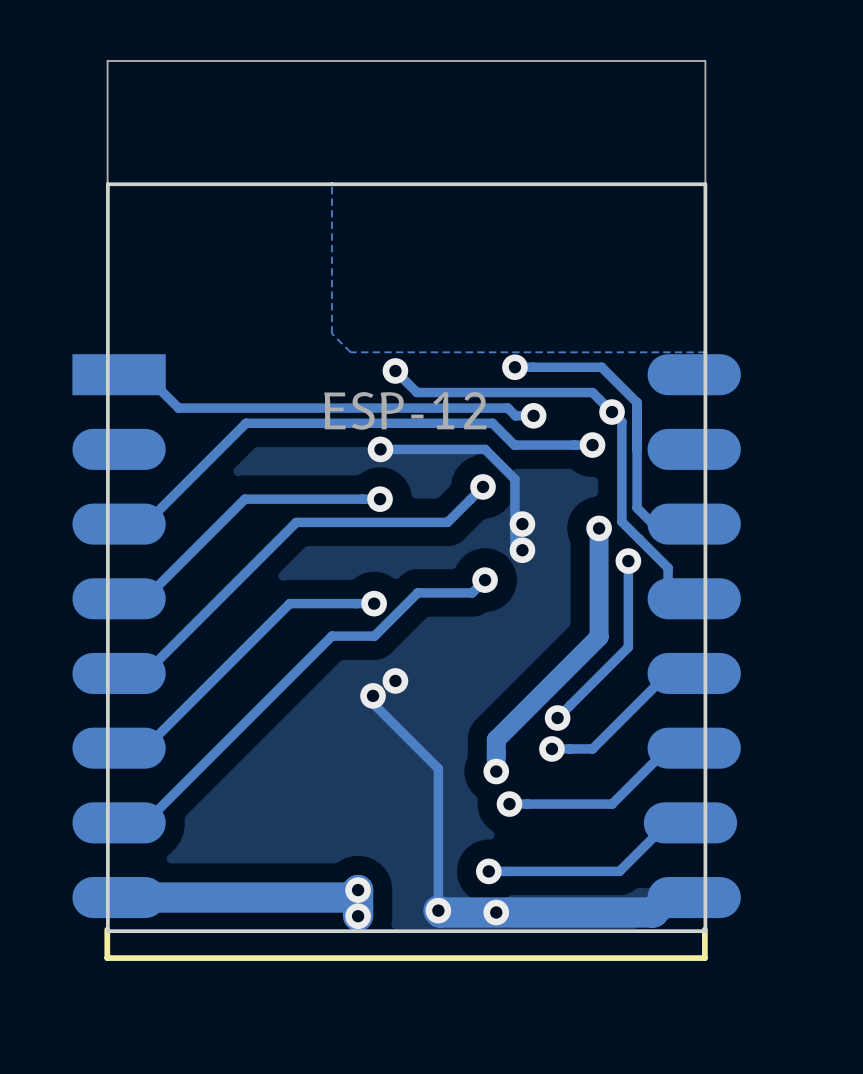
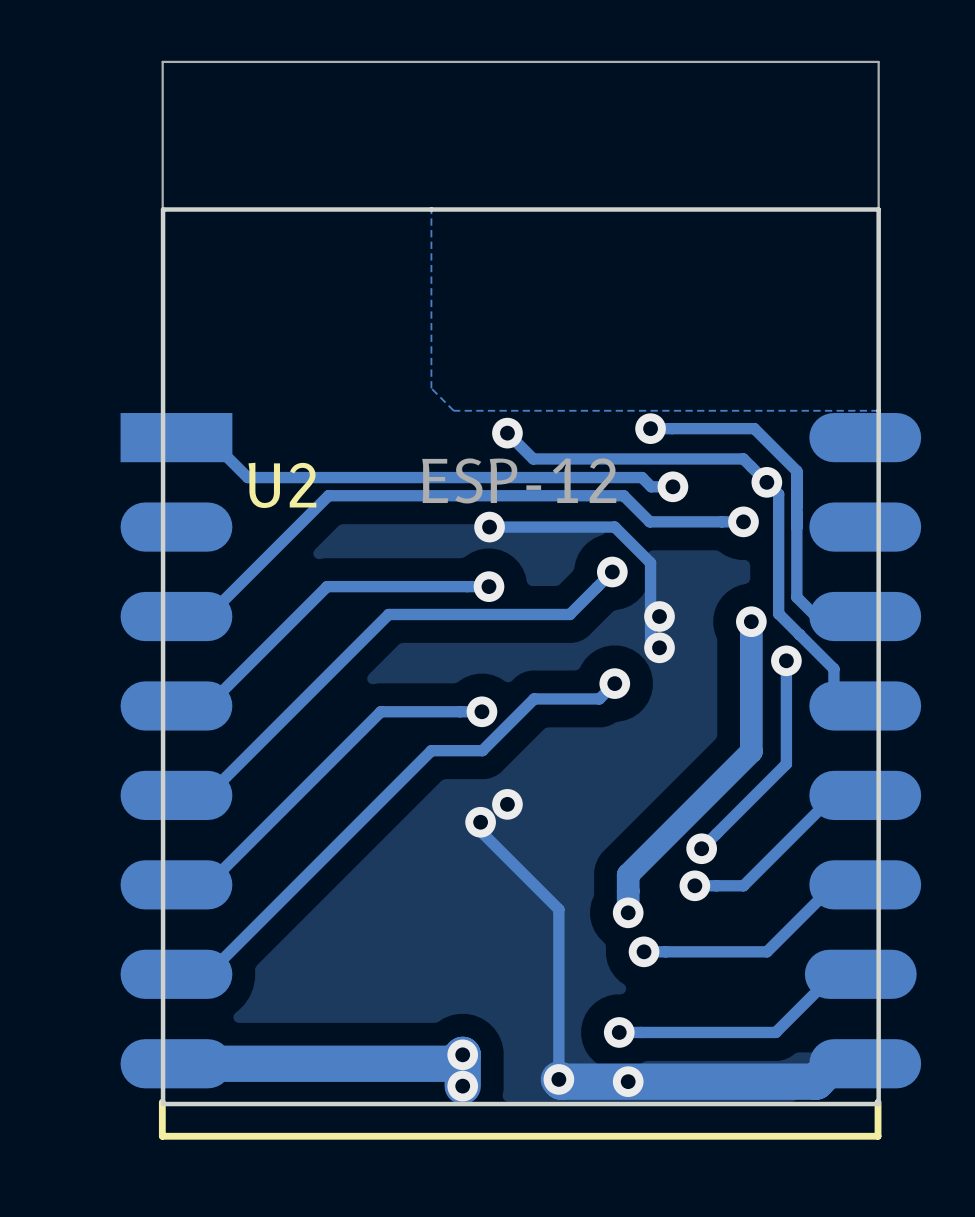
U2 name: none -> U2 (282, 485)

